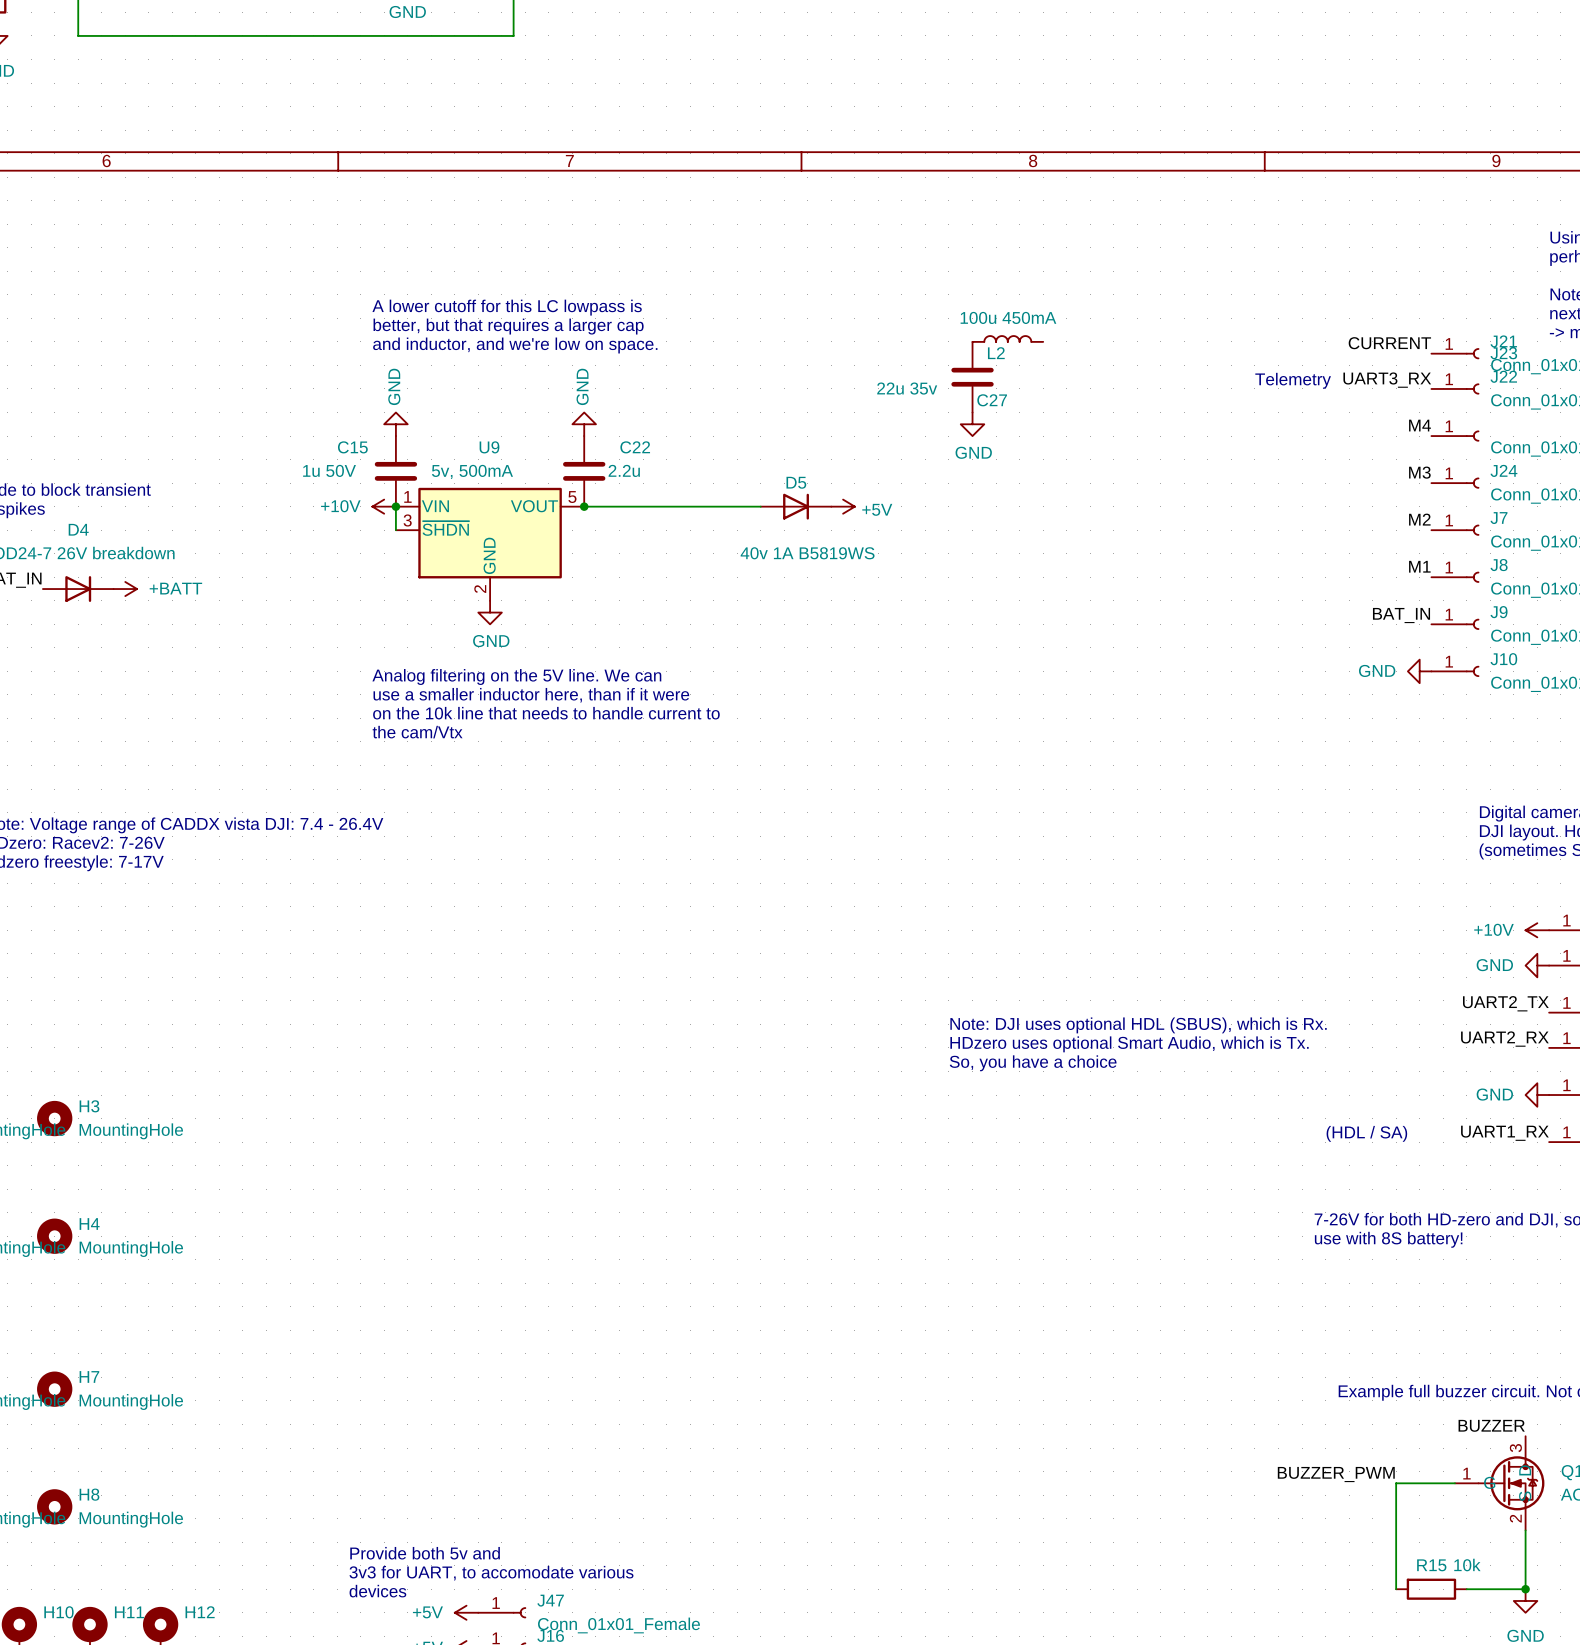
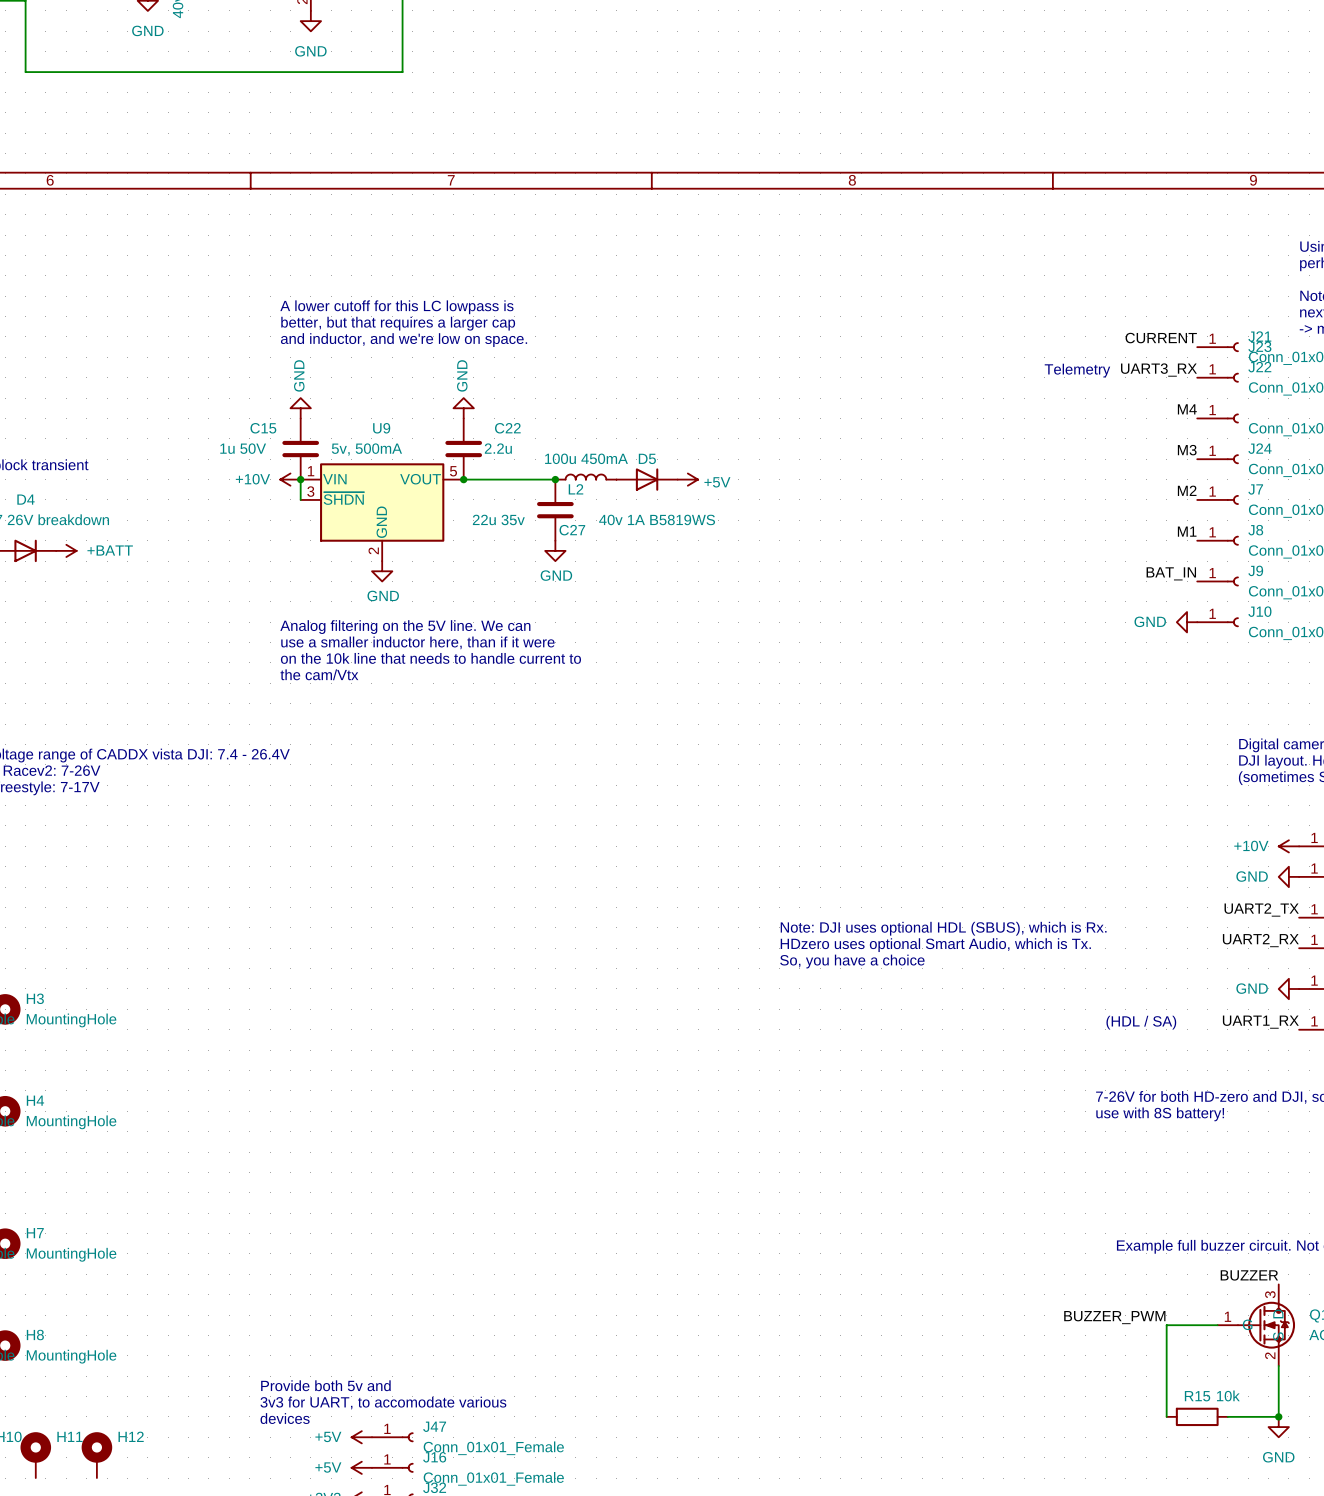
L2 position: (1007, 338) -> (585, 477)
C27 position: (972, 377) -> (555, 510)
power symbol: GND (972, 424) -> none
wire: (690, 506) (760, 506) -> none
junction: none -> (555, 479)
power symbol: none -> GND (555, 550)

